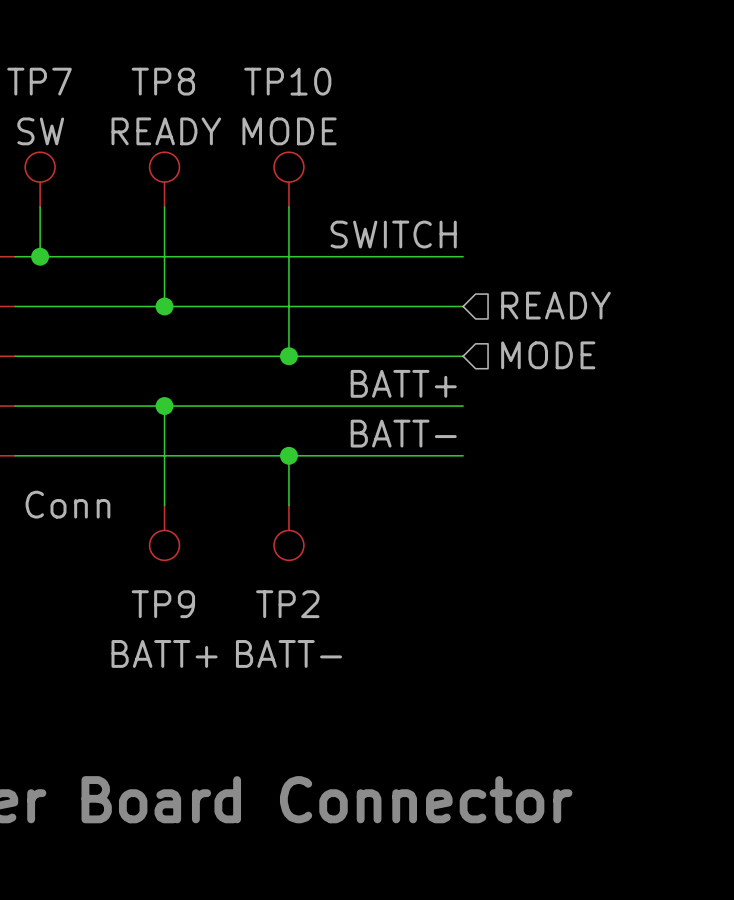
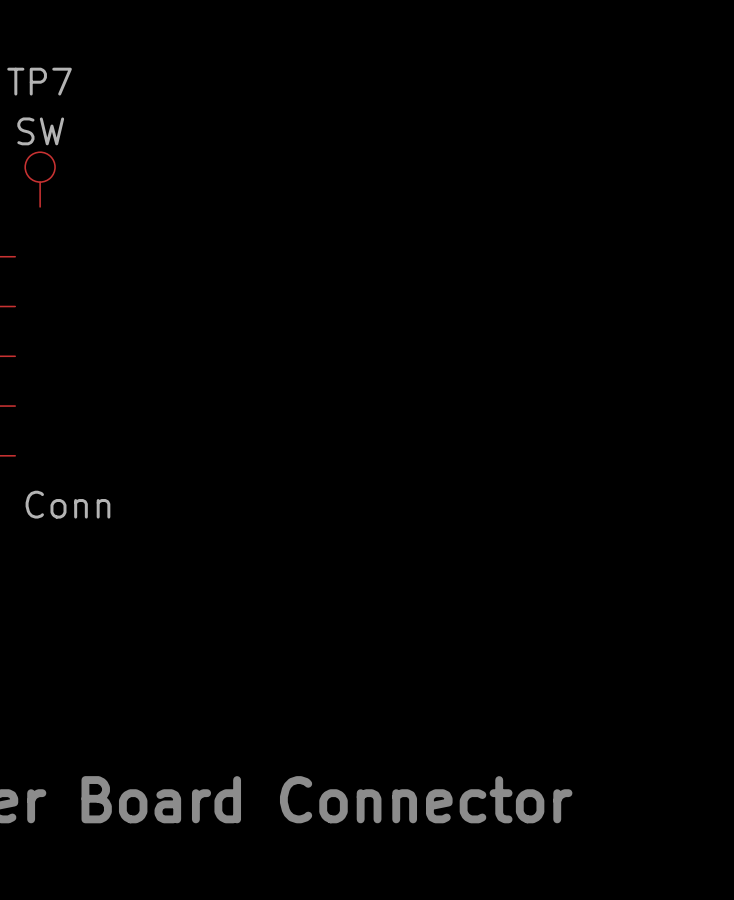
TP8: (164, 179) -> none
TP10: (288, 179) -> none
wire: (40, 206) (40, 256) -> none
wire: (164, 206) (164, 306) -> none
wire: (288, 206) (288, 356) -> none
label: SWITCH (393, 234) -> none
wire: (15, 256) (463, 256) -> none
junction: (40, 256) -> none
hierarchical label: READY (555, 305) -> none
wire: (15, 306) (463, 306) -> none
junction: (164, 306) -> none
hierarchical label: MODE (548, 355) -> none
wire: (15, 356) (463, 356) -> none
junction: (288, 356) -> none
label: BATT+ (403, 383) -> none
wire: (15, 406) (463, 406) -> none
wire: (164, 406) (164, 505) -> none
junction: (164, 406) -> none
label: BATT- (403, 433) -> none
wire: (15, 455) (463, 455) -> none
wire: (288, 455) (288, 505) -> none
junction: (288, 455) -> none
TP9: (164, 532) -> none
TP2: (288, 532) -> none

